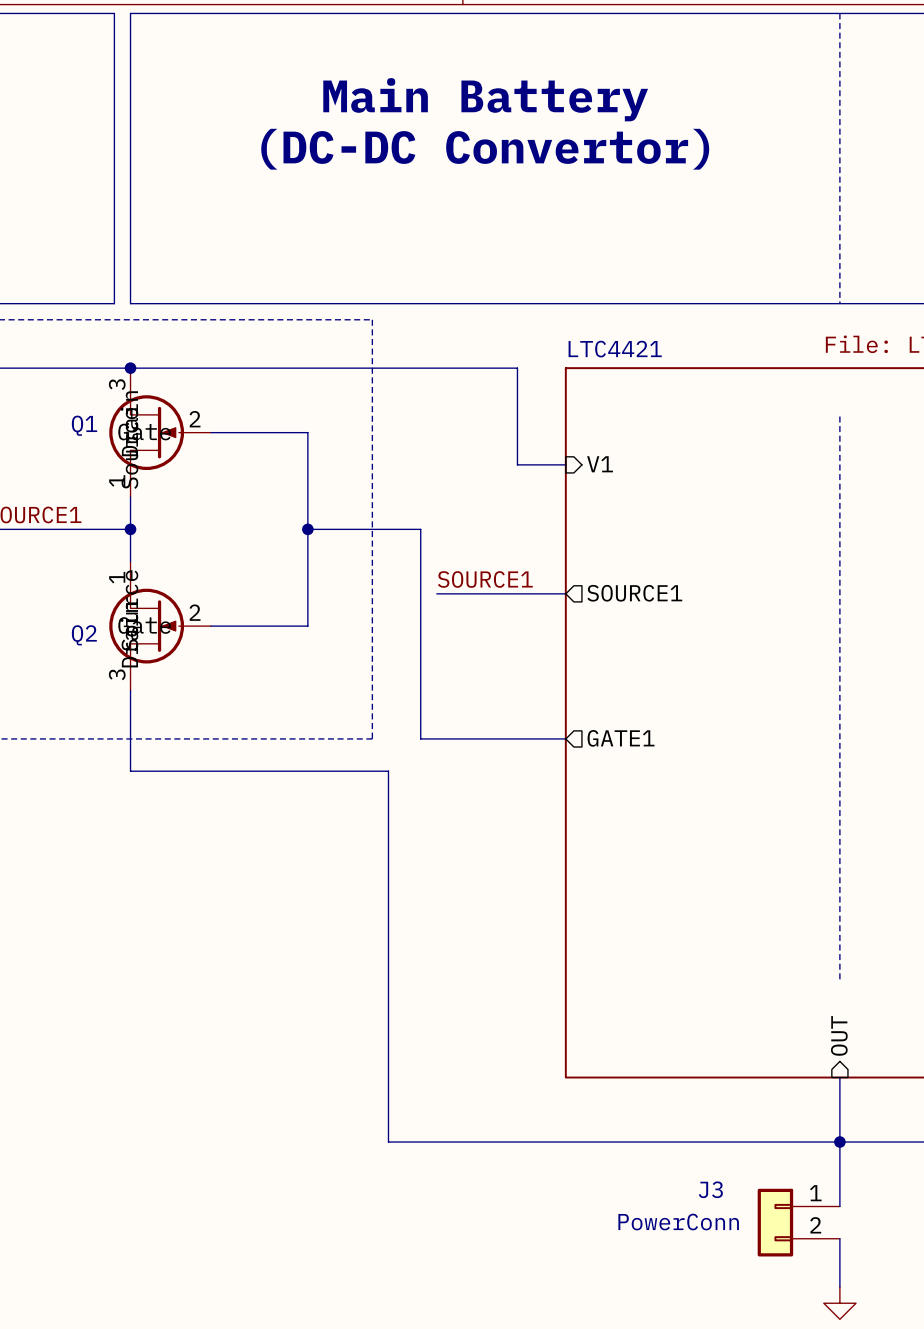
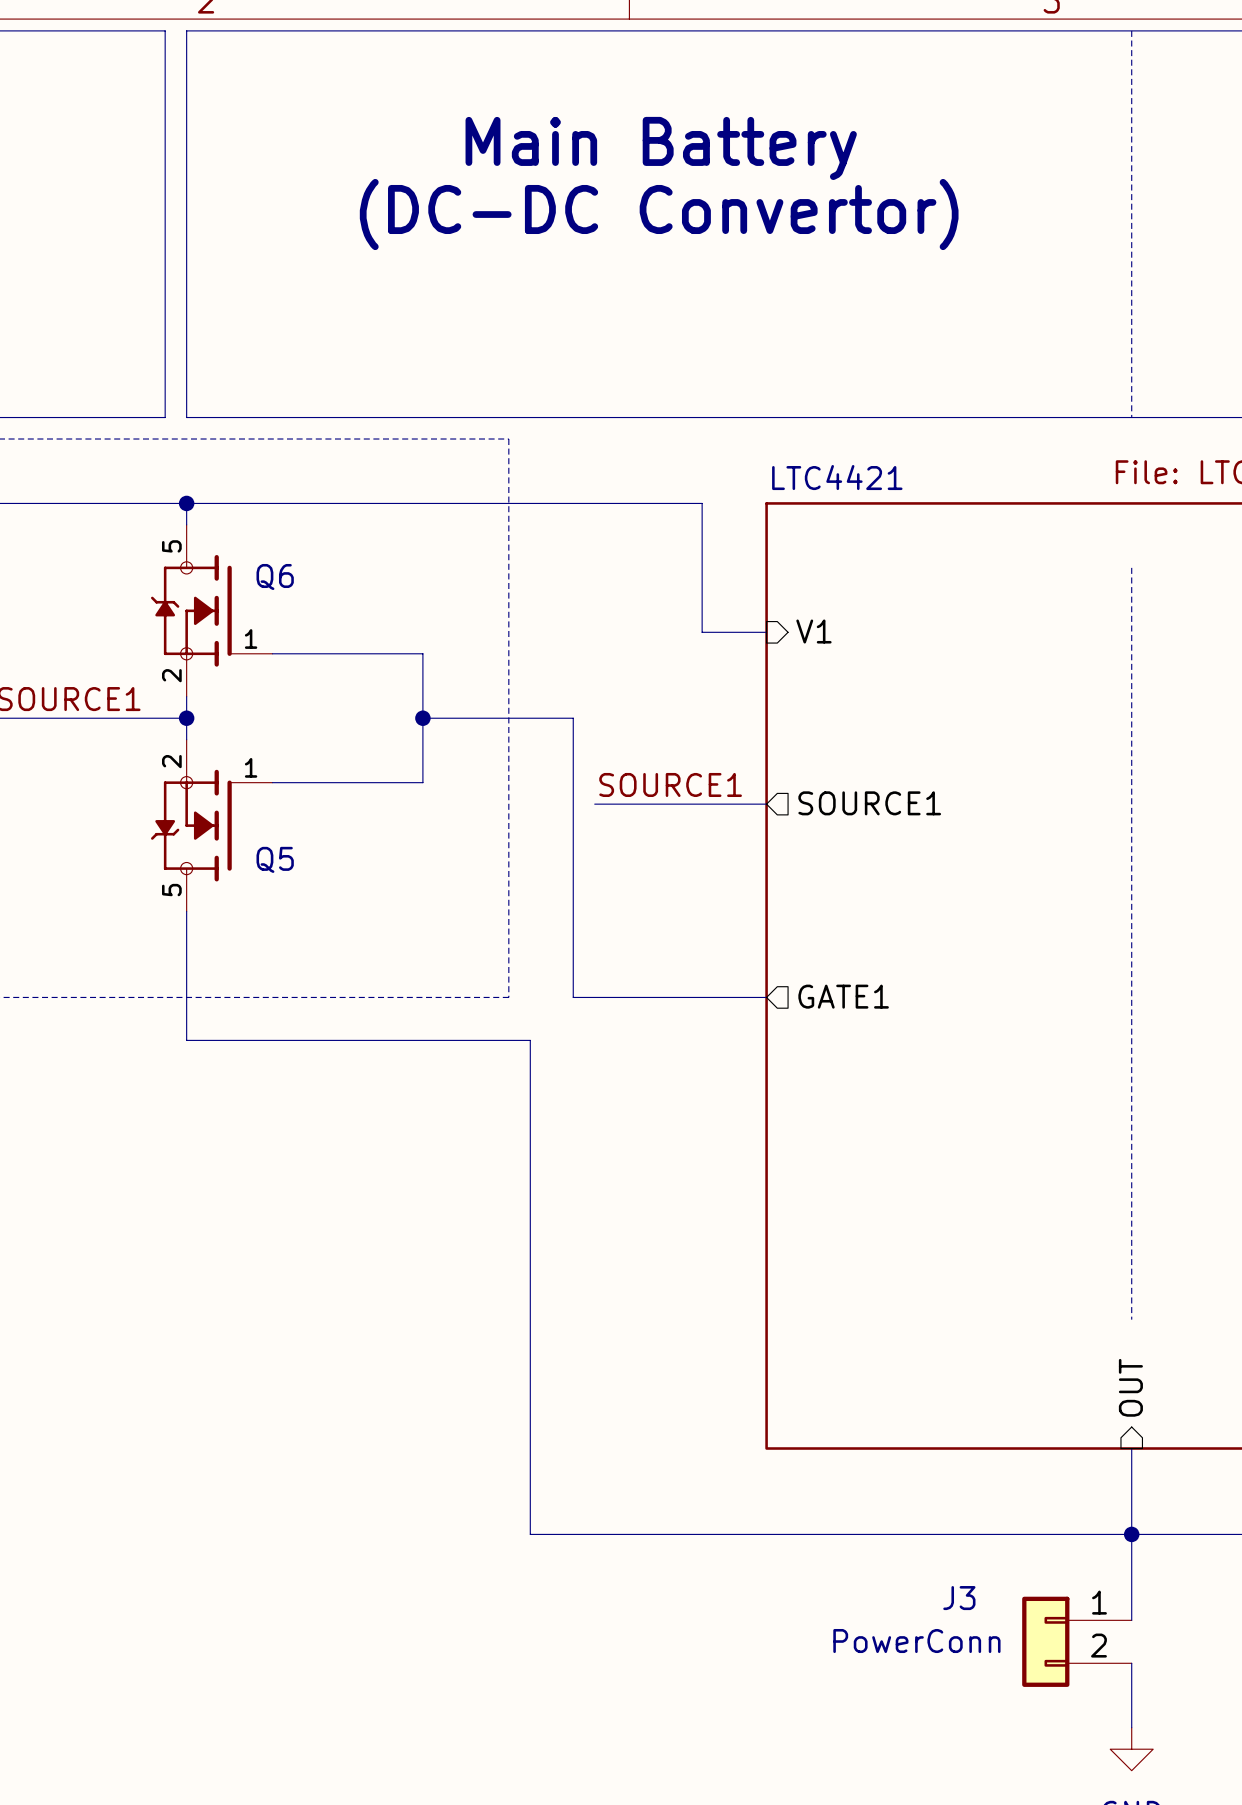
Q1: (160, 432) -> none
wire: (211, 432) (307, 432) (307, 481) -> (272, 653) (422, 653)
Q6: none -> (211, 610)
wire: (307, 577) (307, 626) (211, 626) -> (422, 782) (272, 782)
Q5: none -> (211, 825)
Q2: (160, 626) -> none

